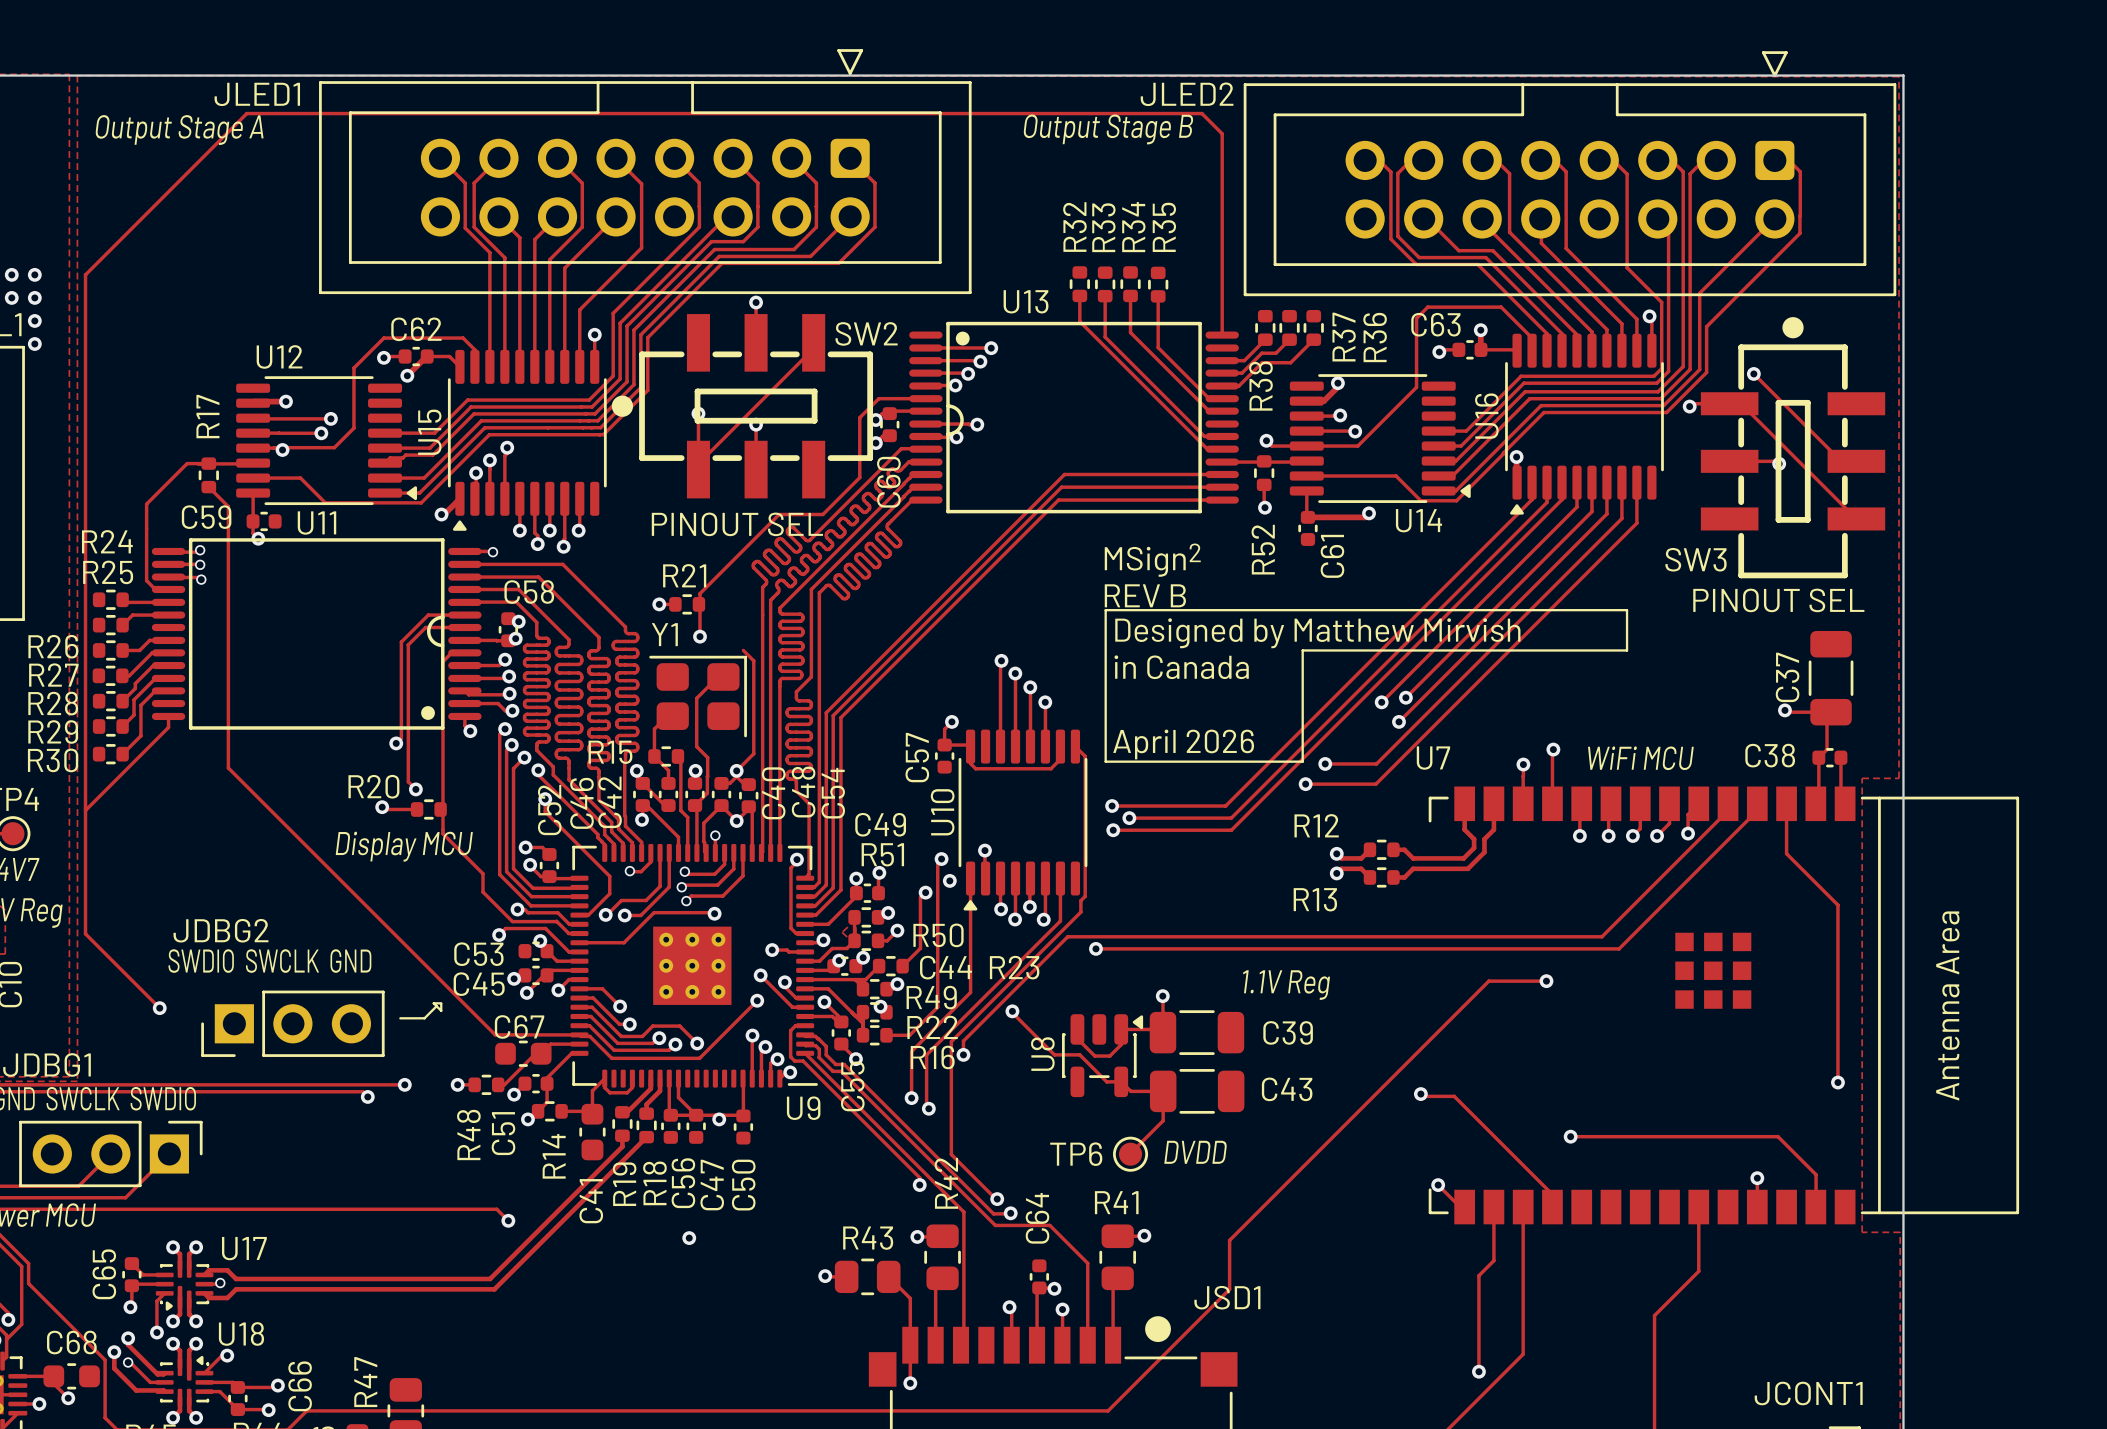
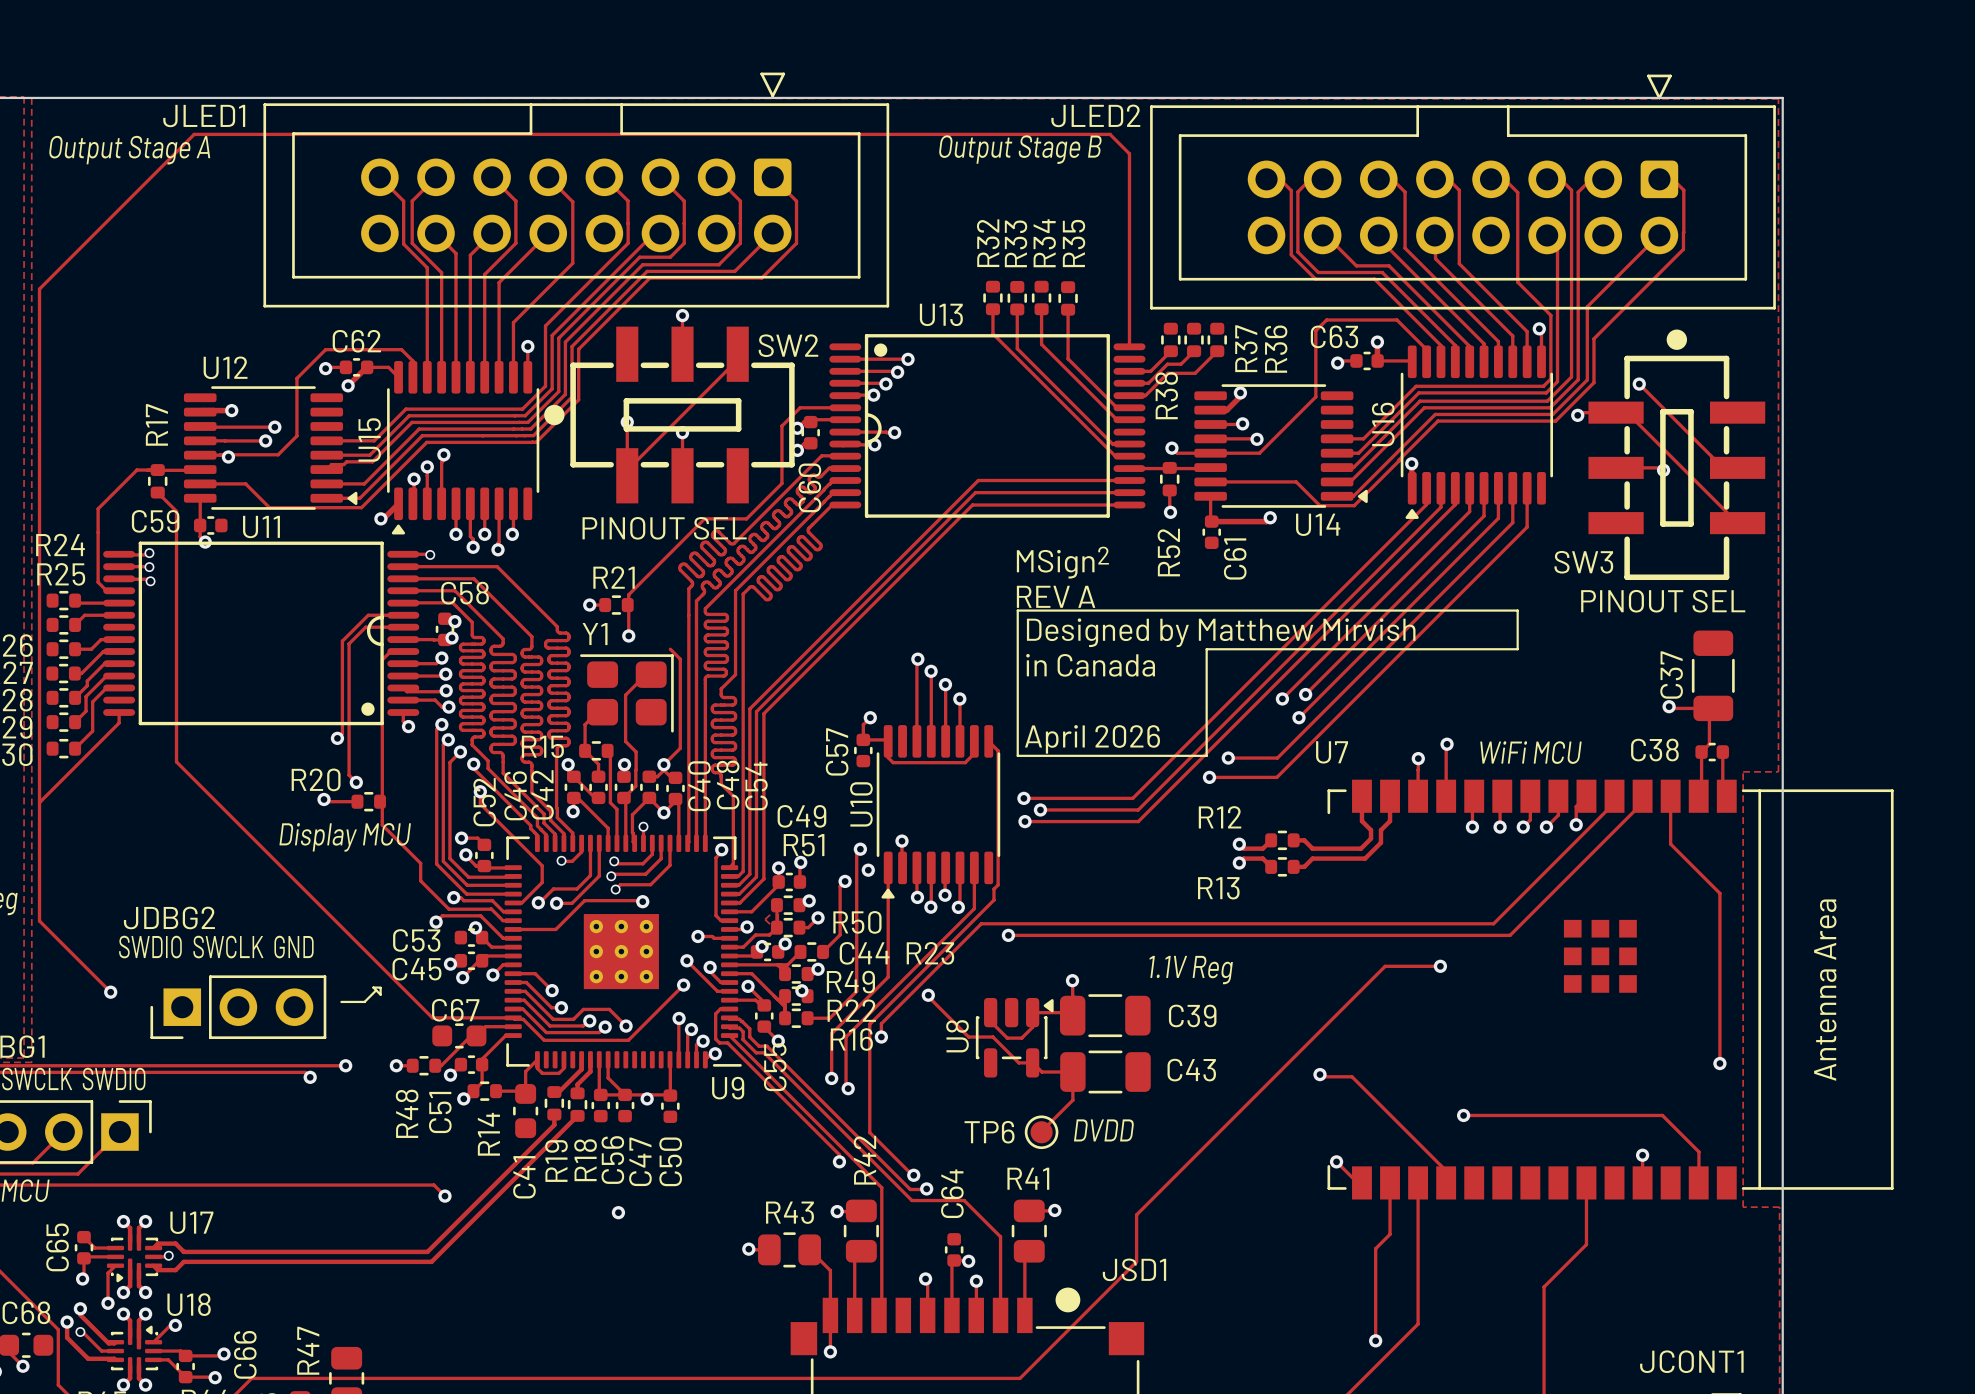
text: REV B (1145, 595) -> REV A (1056, 596)

